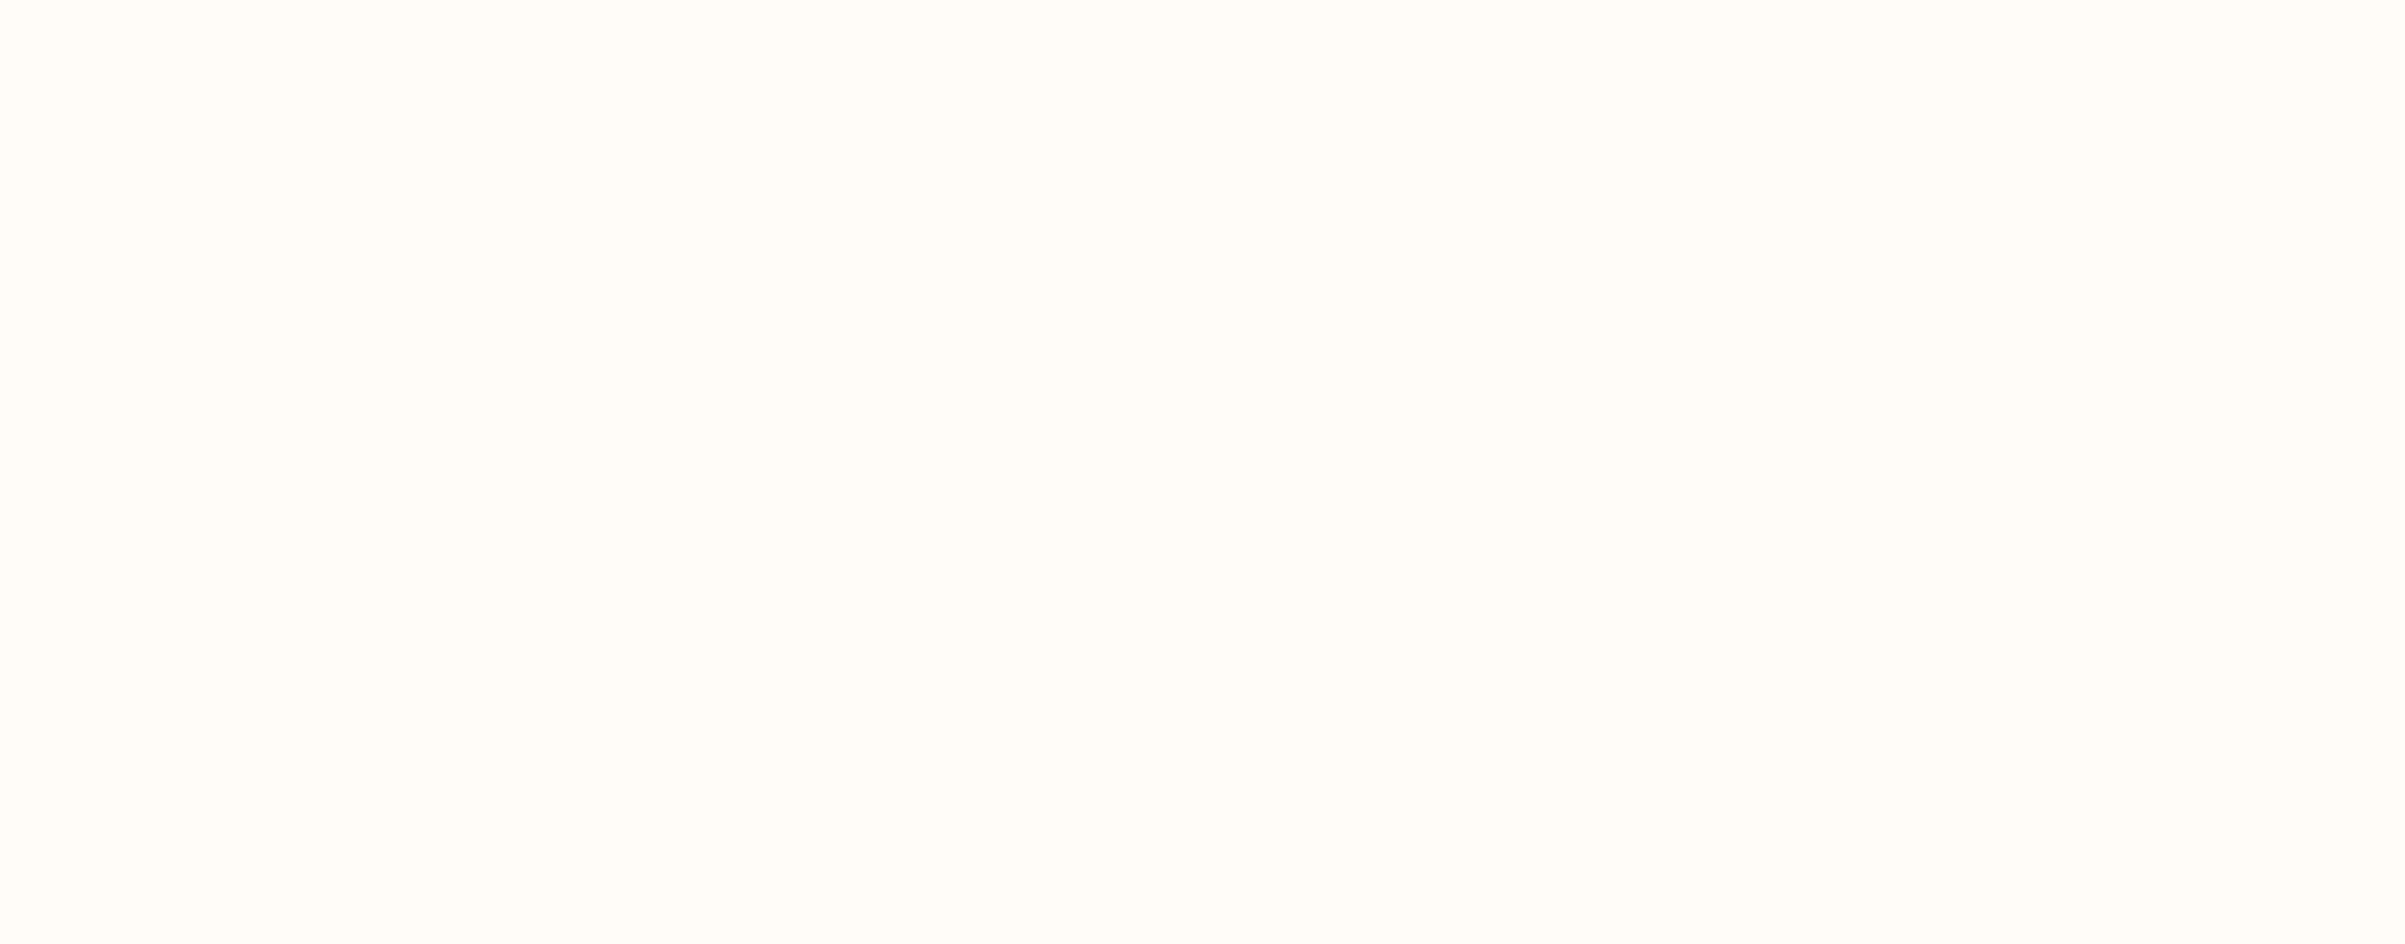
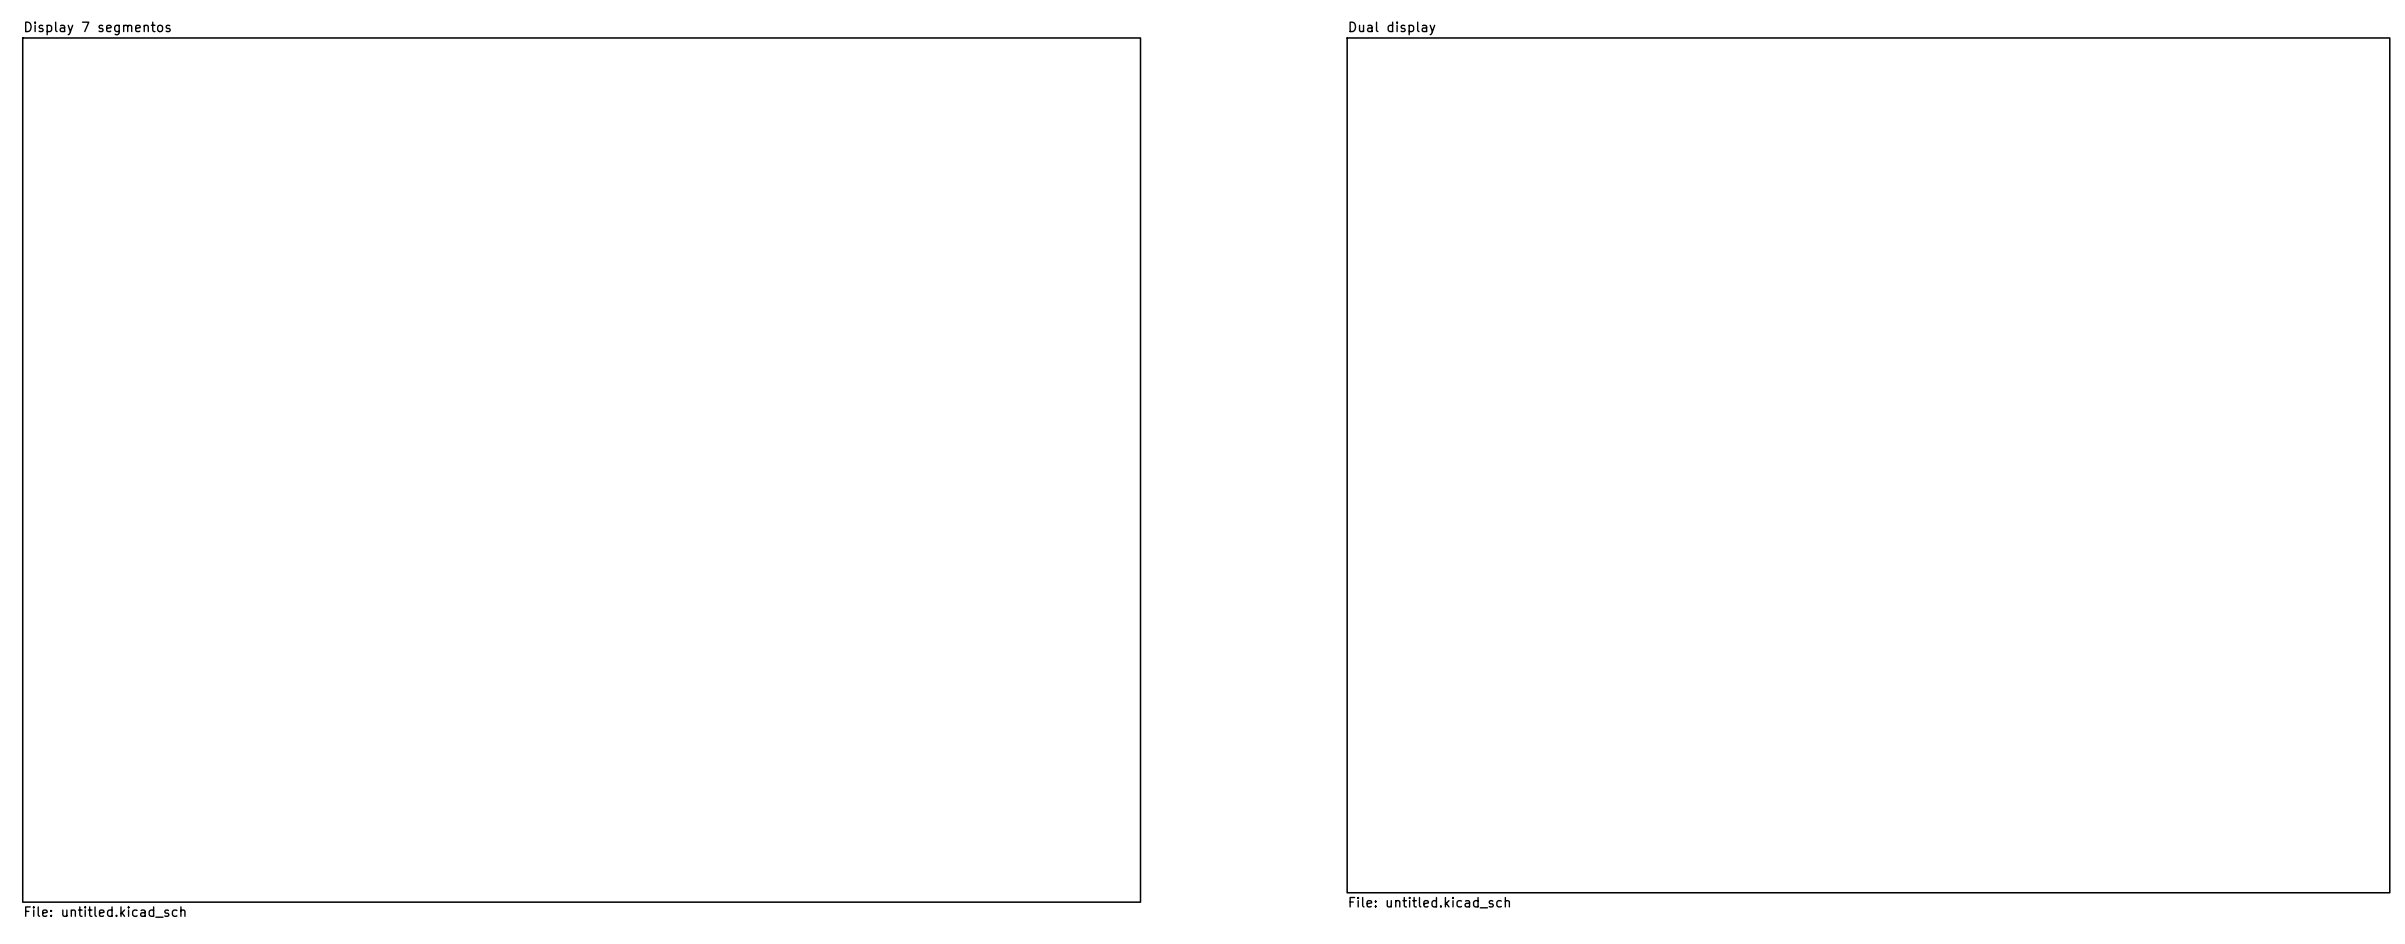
sheet Dual display: none -> File: untitled.kicad_sch (1868, 465)
sheet Display 7 segmentos: none -> File: untitled.kicad_sch (581, 470)

